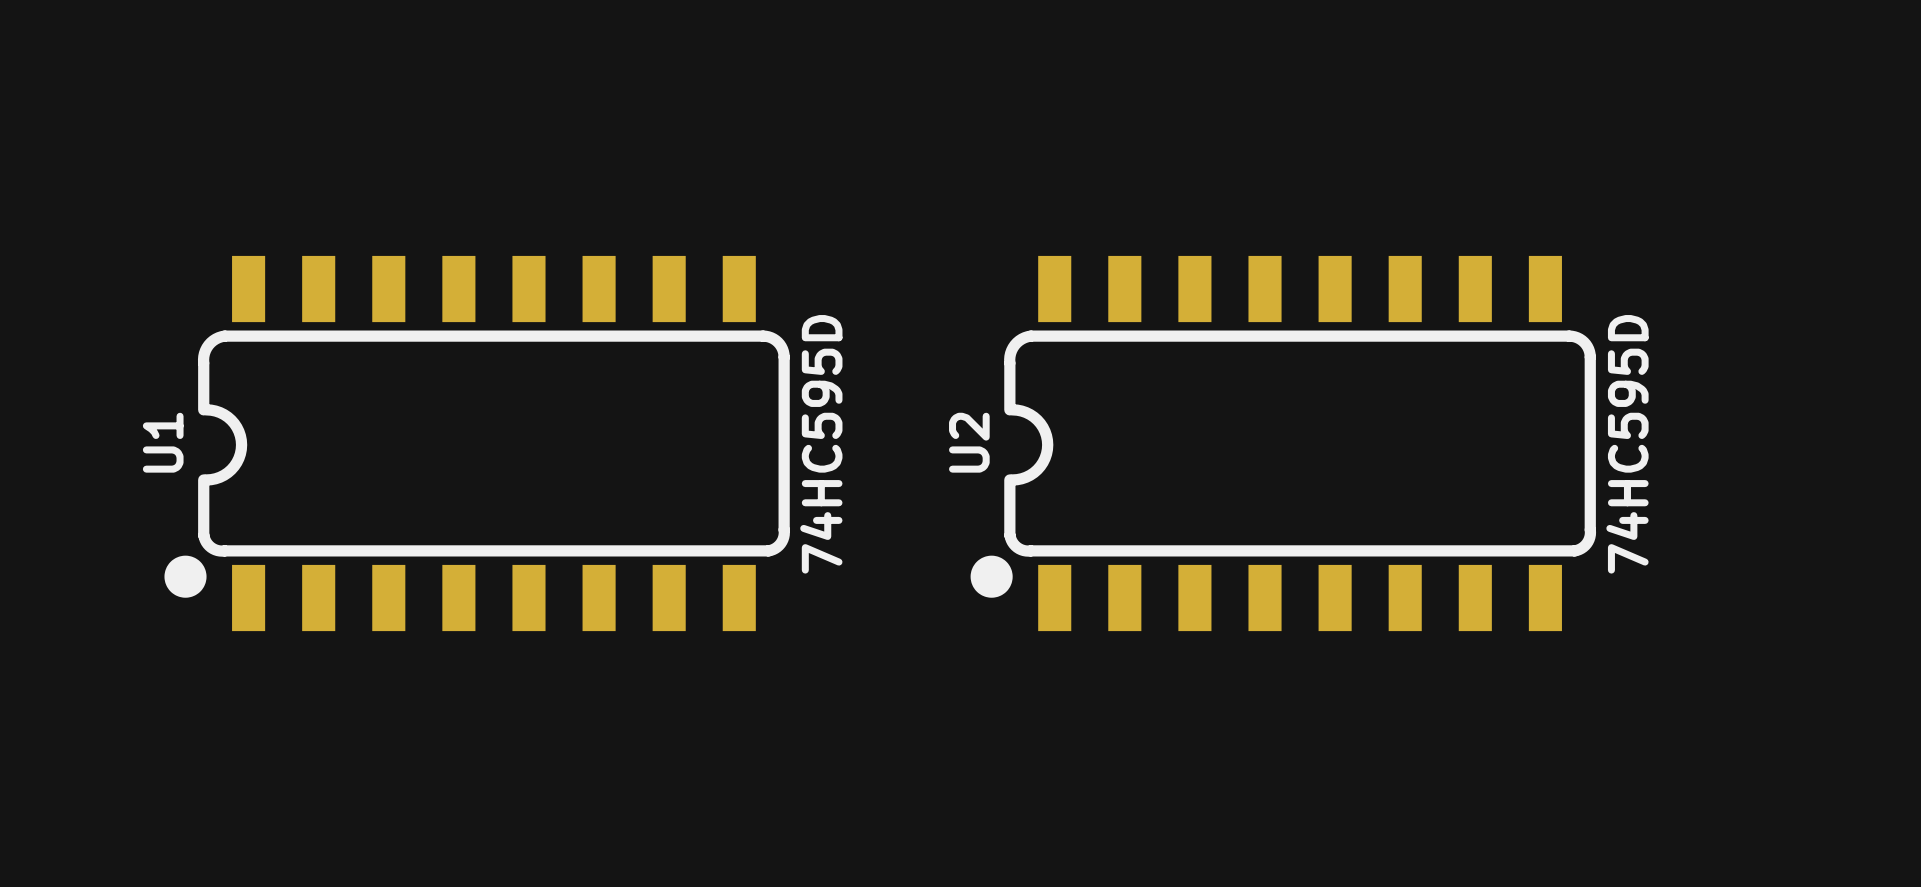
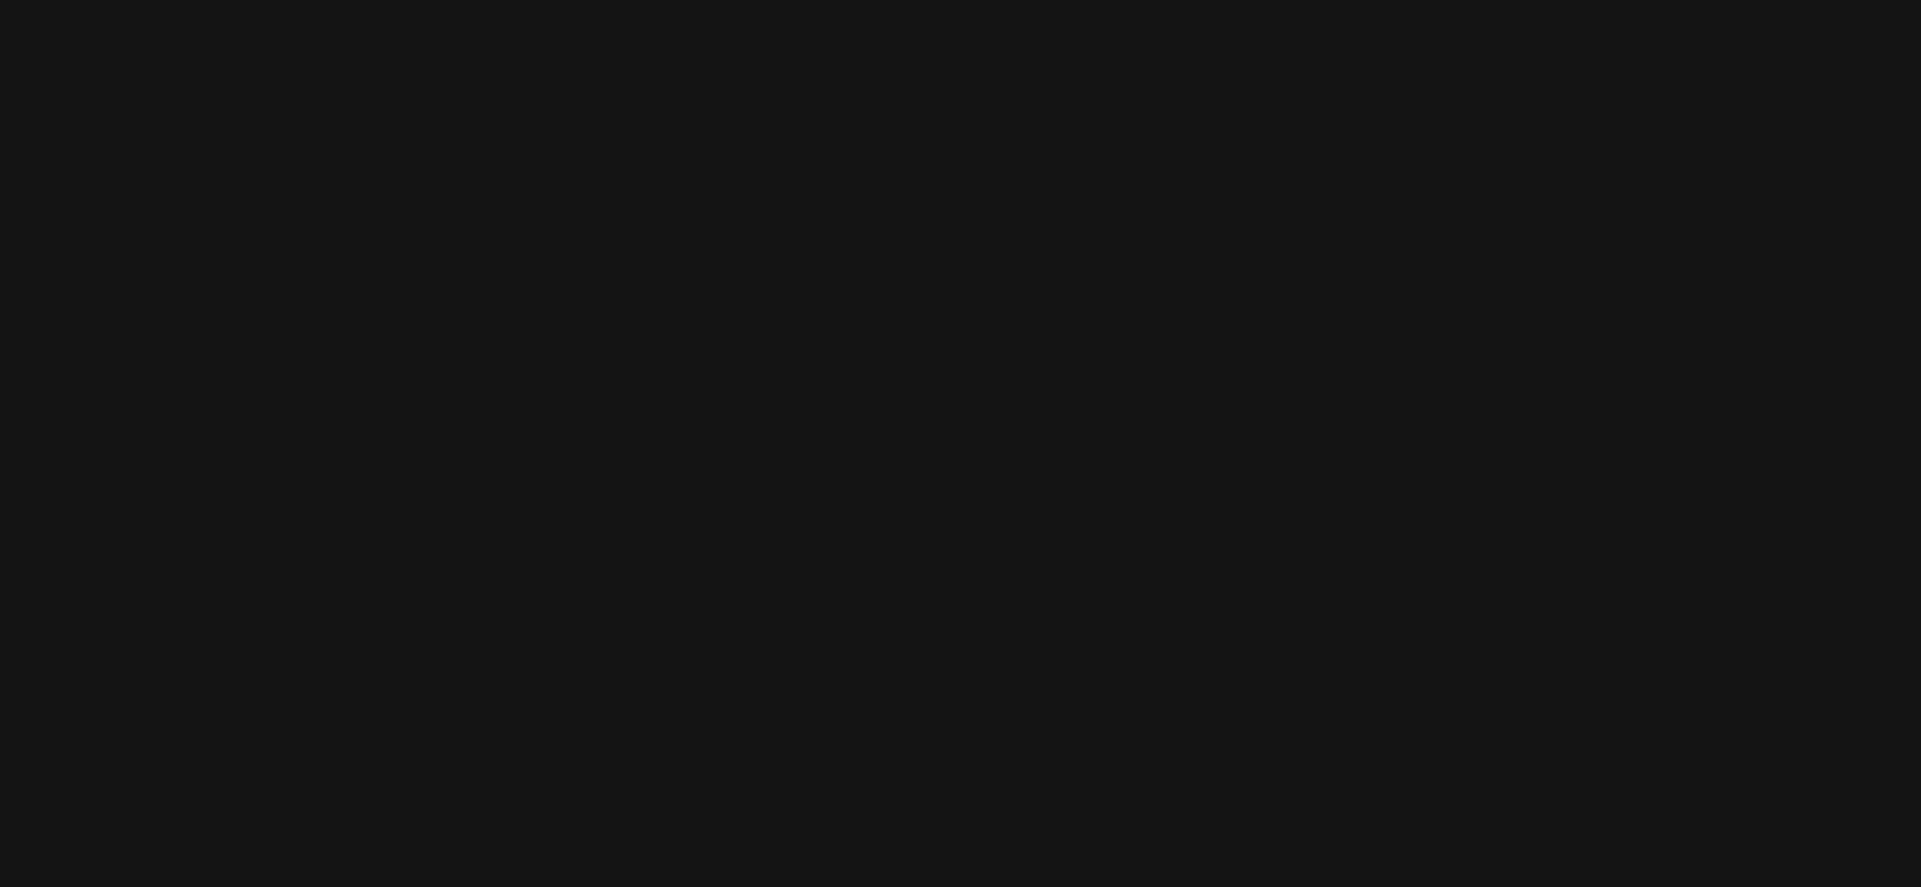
U1: 74HC595D (477, 443) -> none
U2: 74HC595D (1283, 443) -> none

